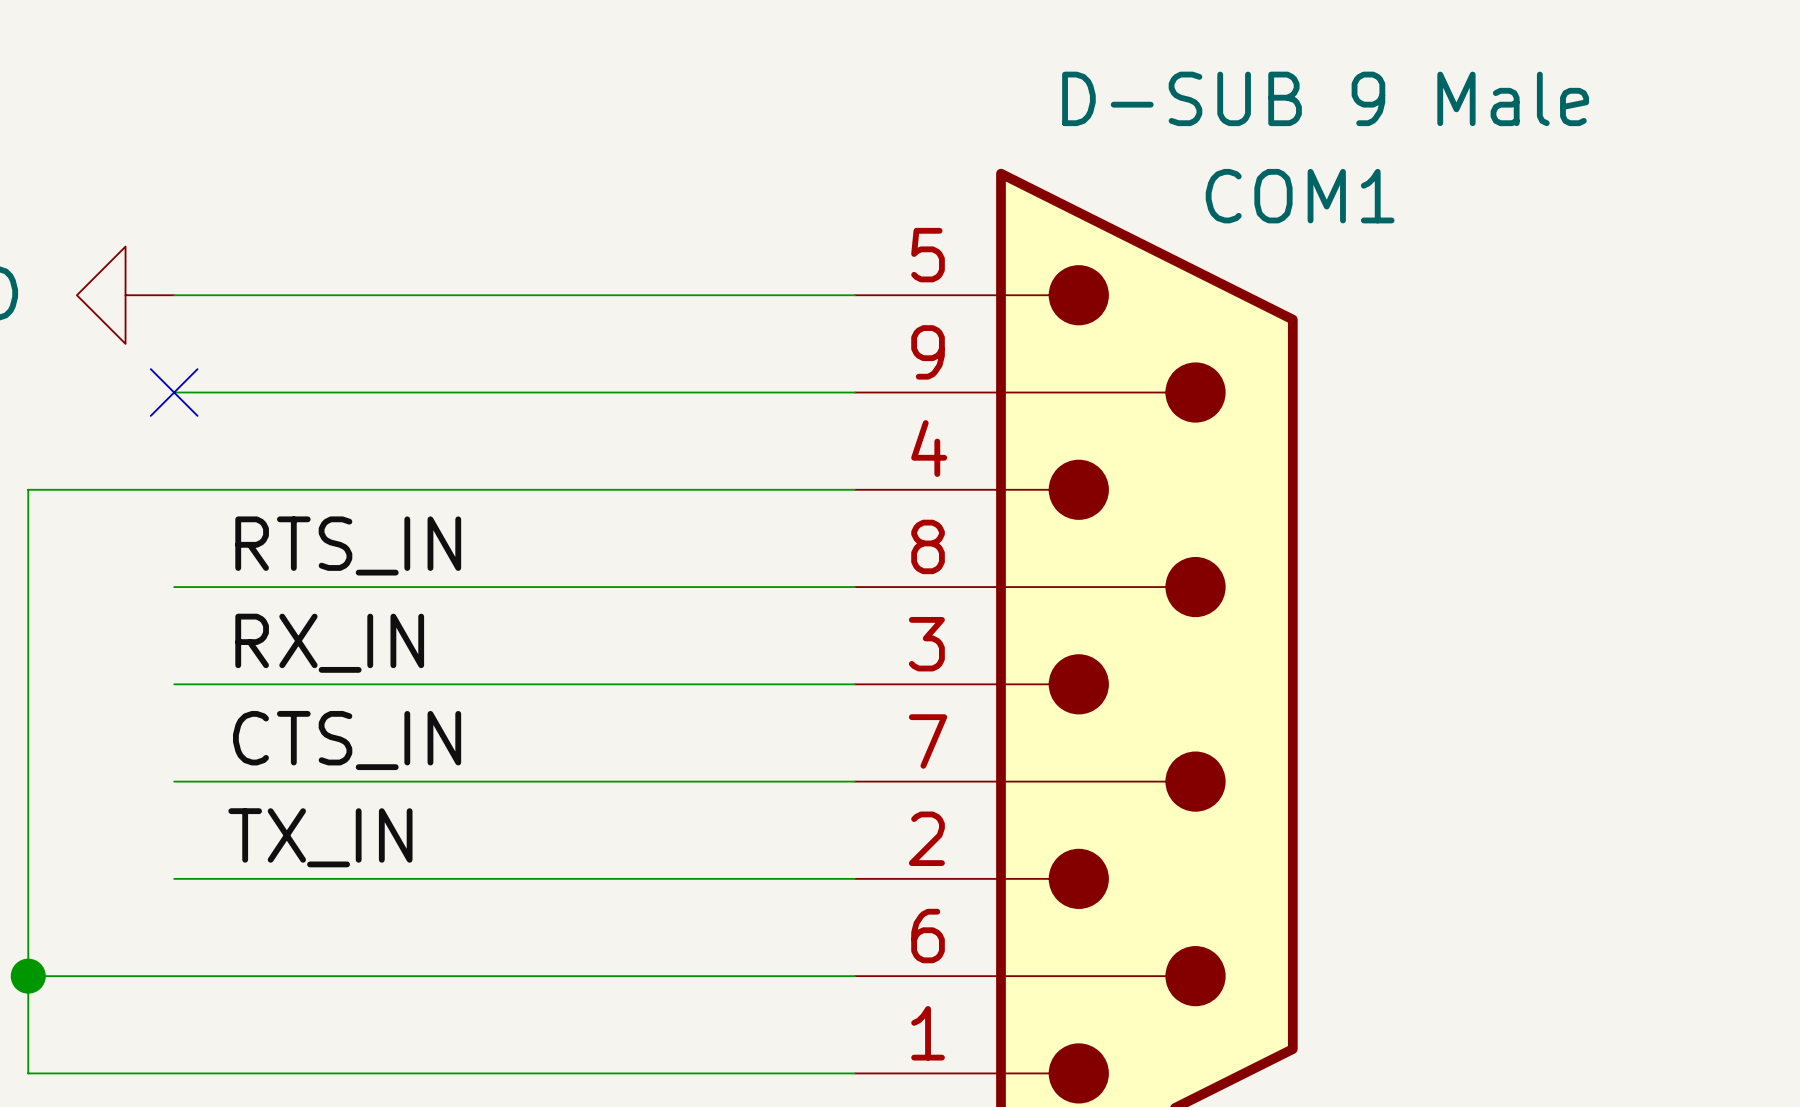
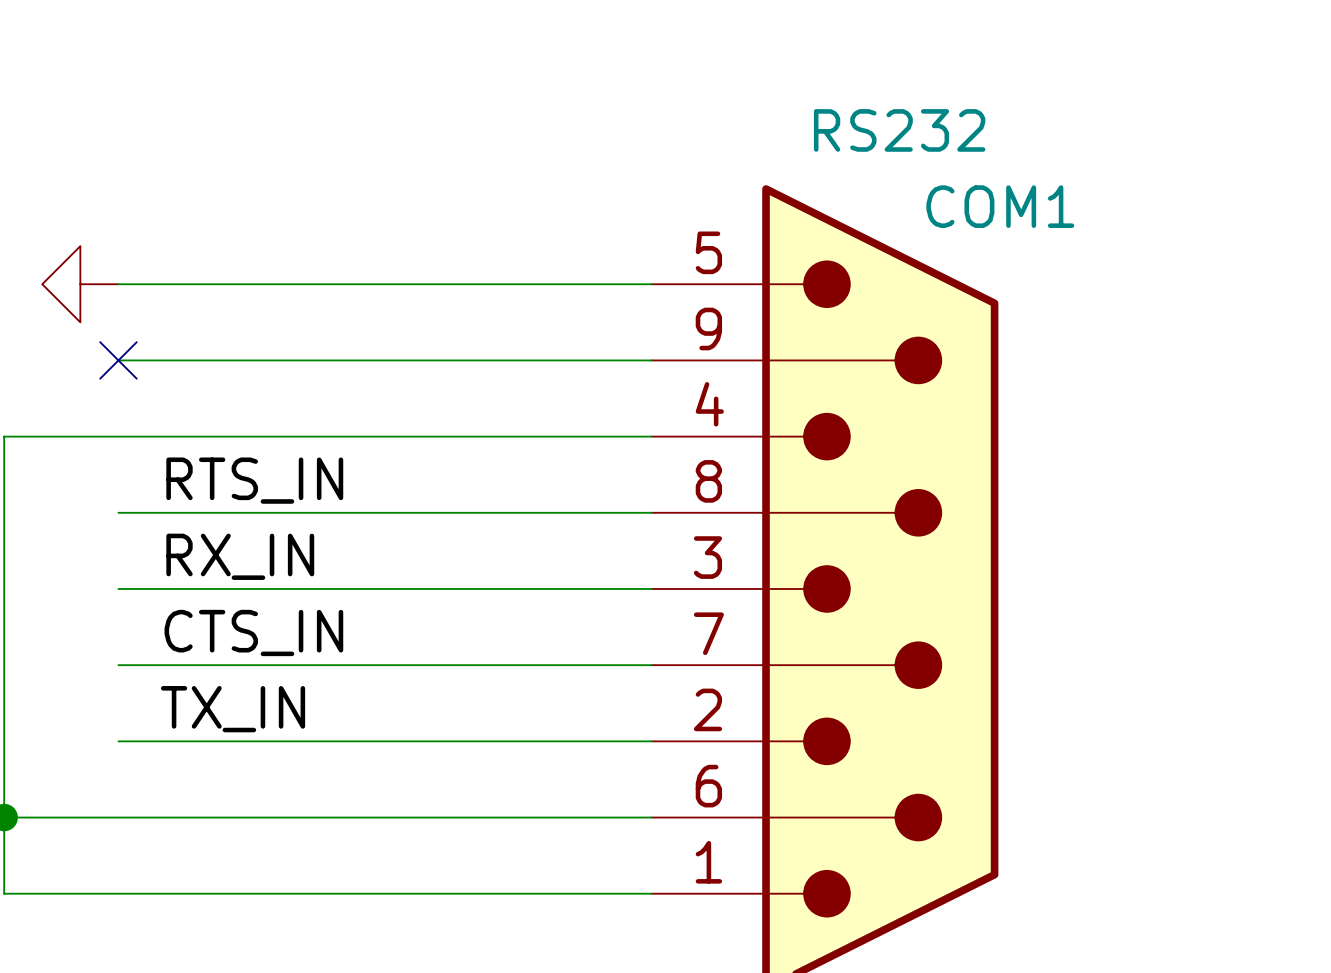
COM1 value: D-SUB 9 Male (1325, 98) -> RS232 (899, 130)

